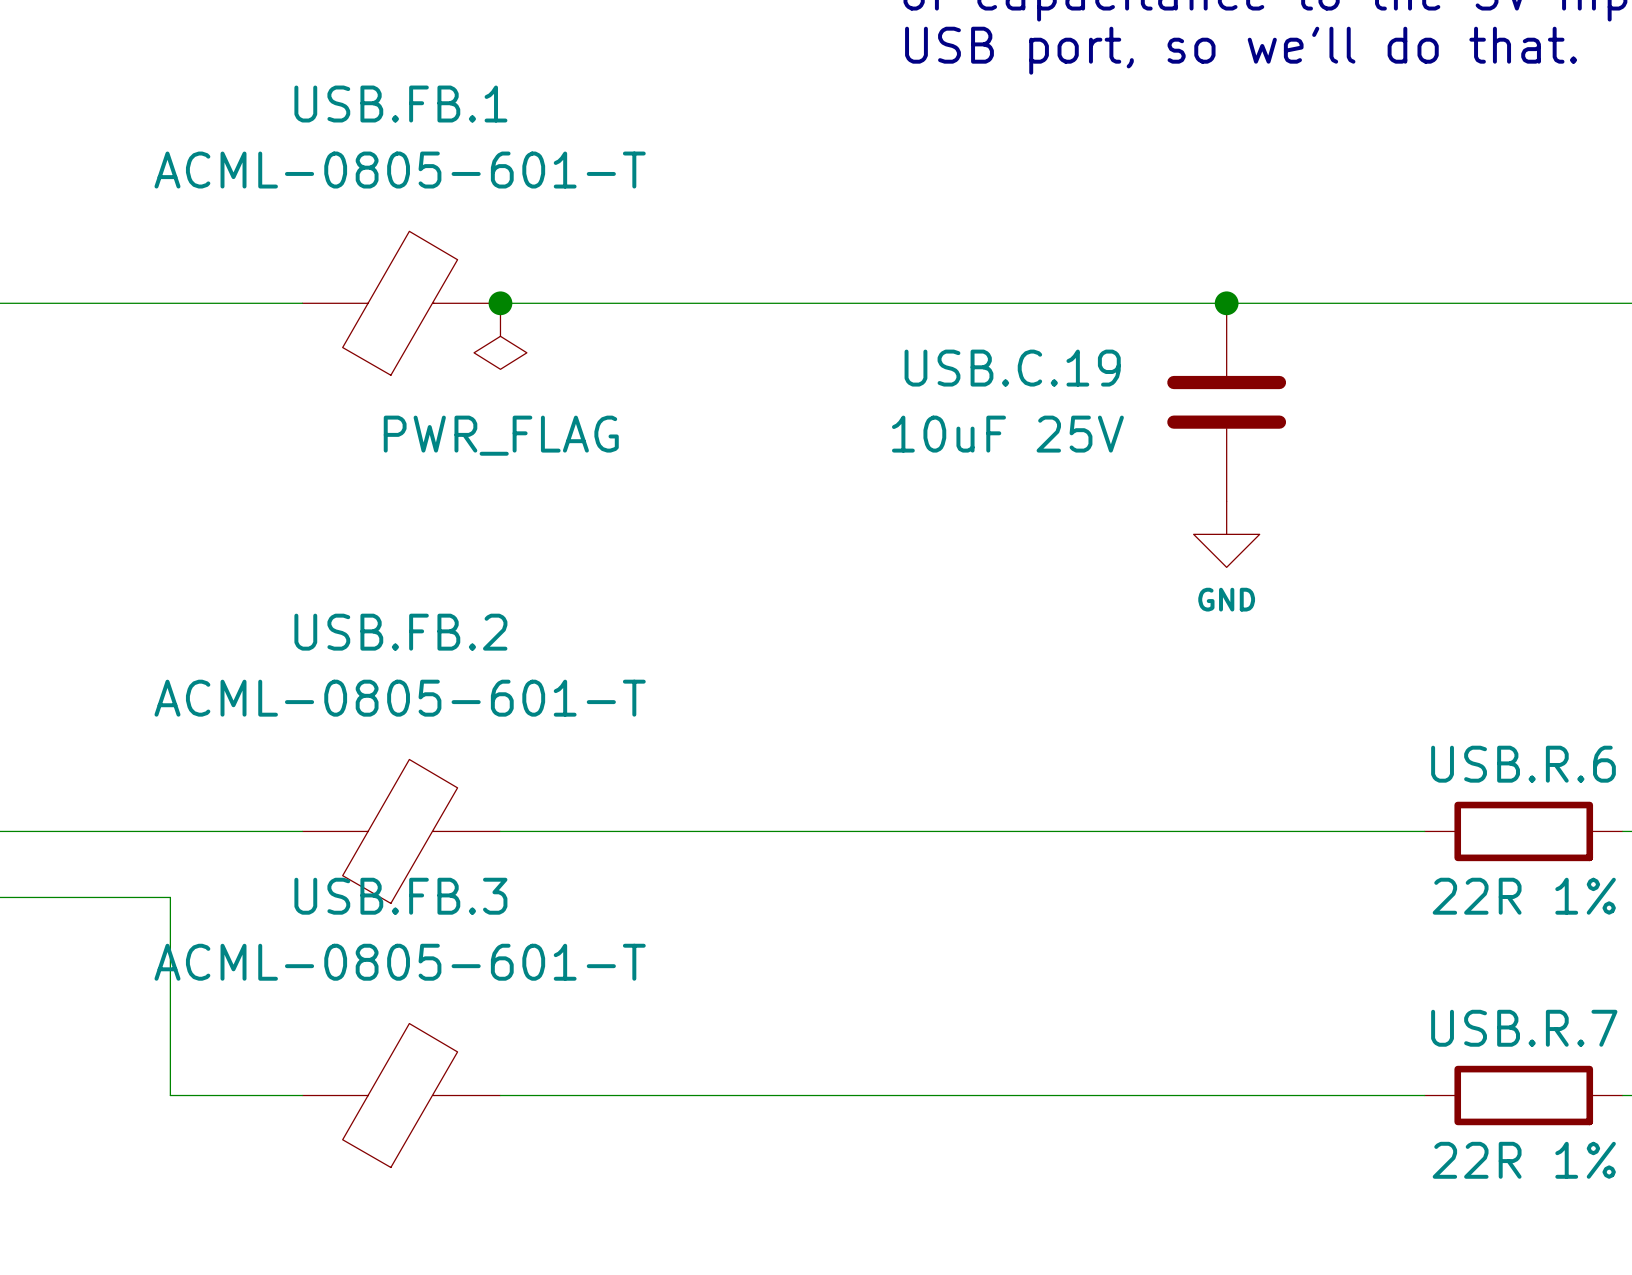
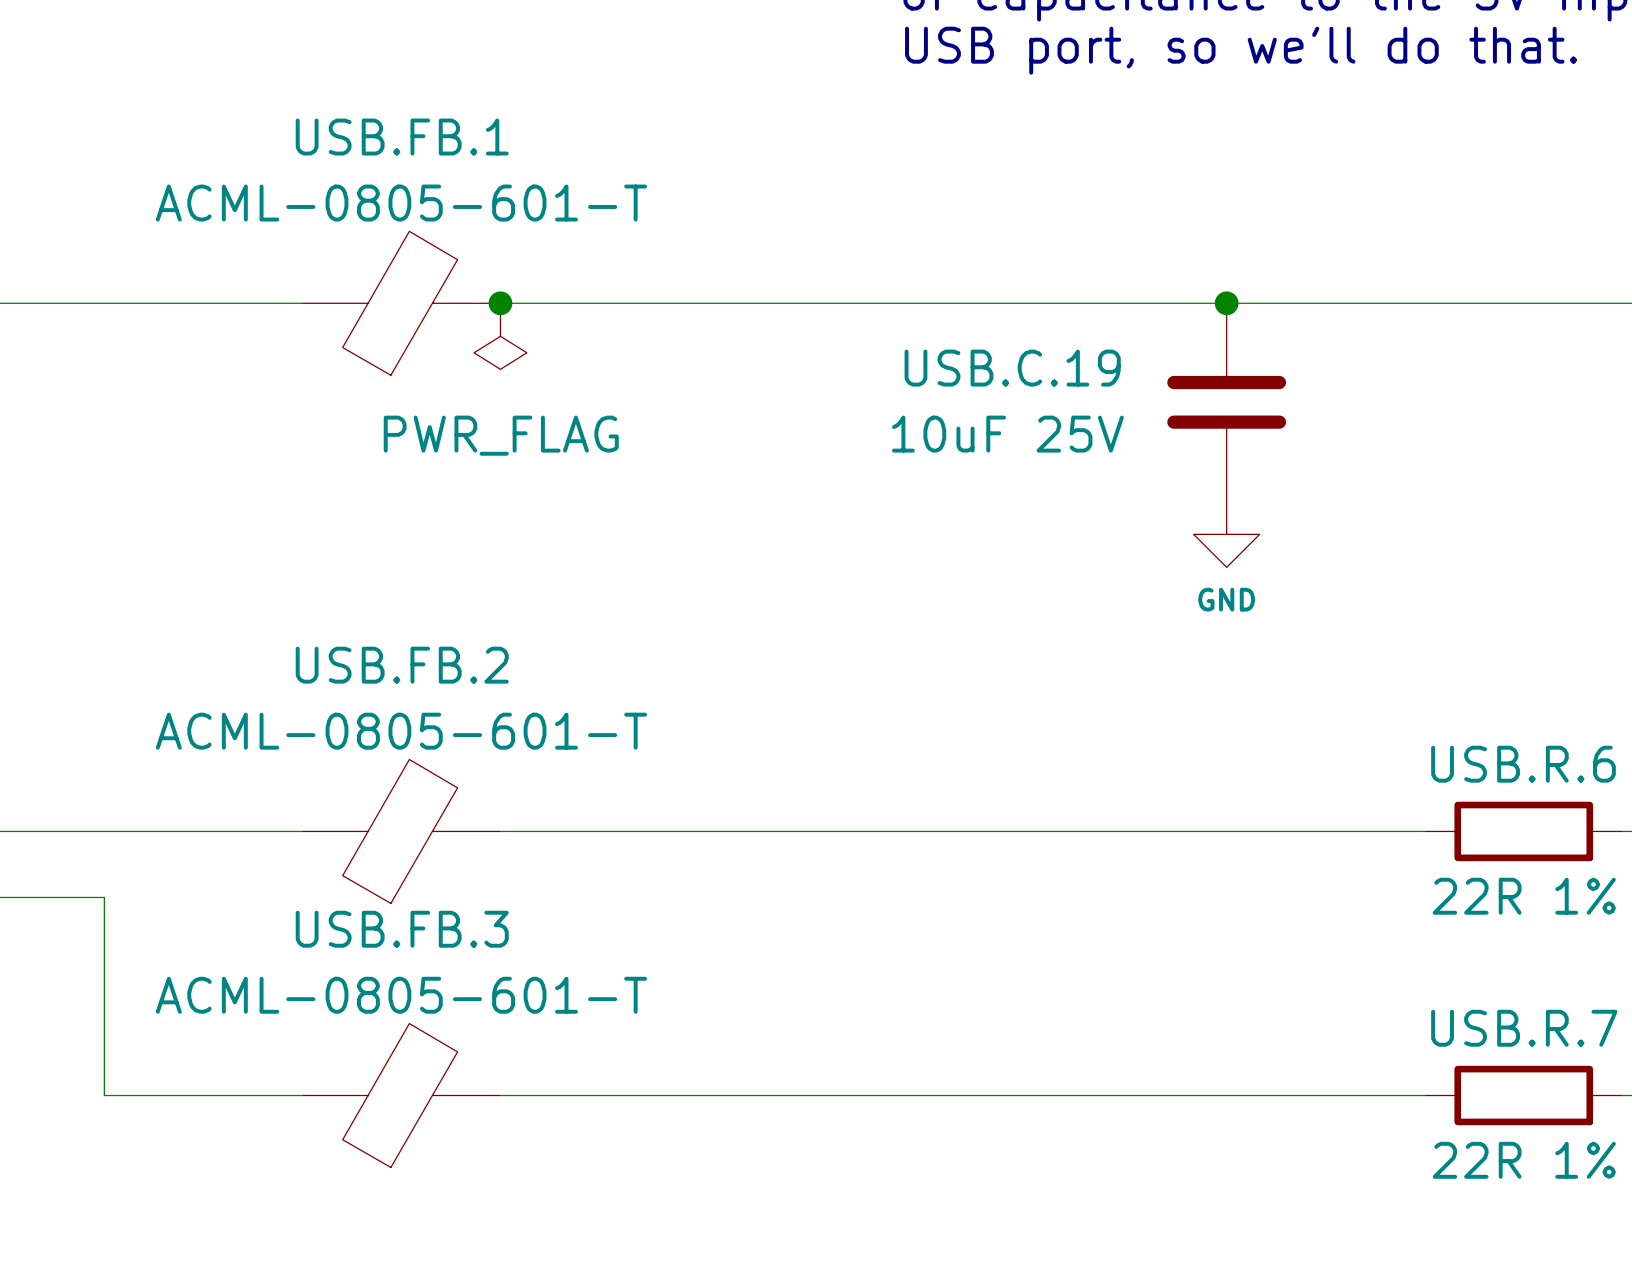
USB.FB.1 name position: USB.FB.1 (400, 104) -> USB.FB.1 (402, 137)
USB.FB.1 value position: ACML-0805-601-T (400, 170) -> ACML-0805-601-T (401, 203)
USB.FB.2 name position: USB.FB.2 (400, 632) -> USB.FB.2 (402, 665)
USB.FB.2 value position: ACML-0805-601-T (400, 698) -> ACML-0805-601-T (401, 731)
USB.FB.3 name position: USB.FB.3 (400, 896) -> USB.FB.3 (402, 929)
wire: (104, 897) (170, 897) (170, 1095) -> (104, 897) (104, 1095) (170, 1095)
USB.FB.3 value position: ACML-0805-601-T (400, 962) -> ACML-0805-601-T (401, 995)

